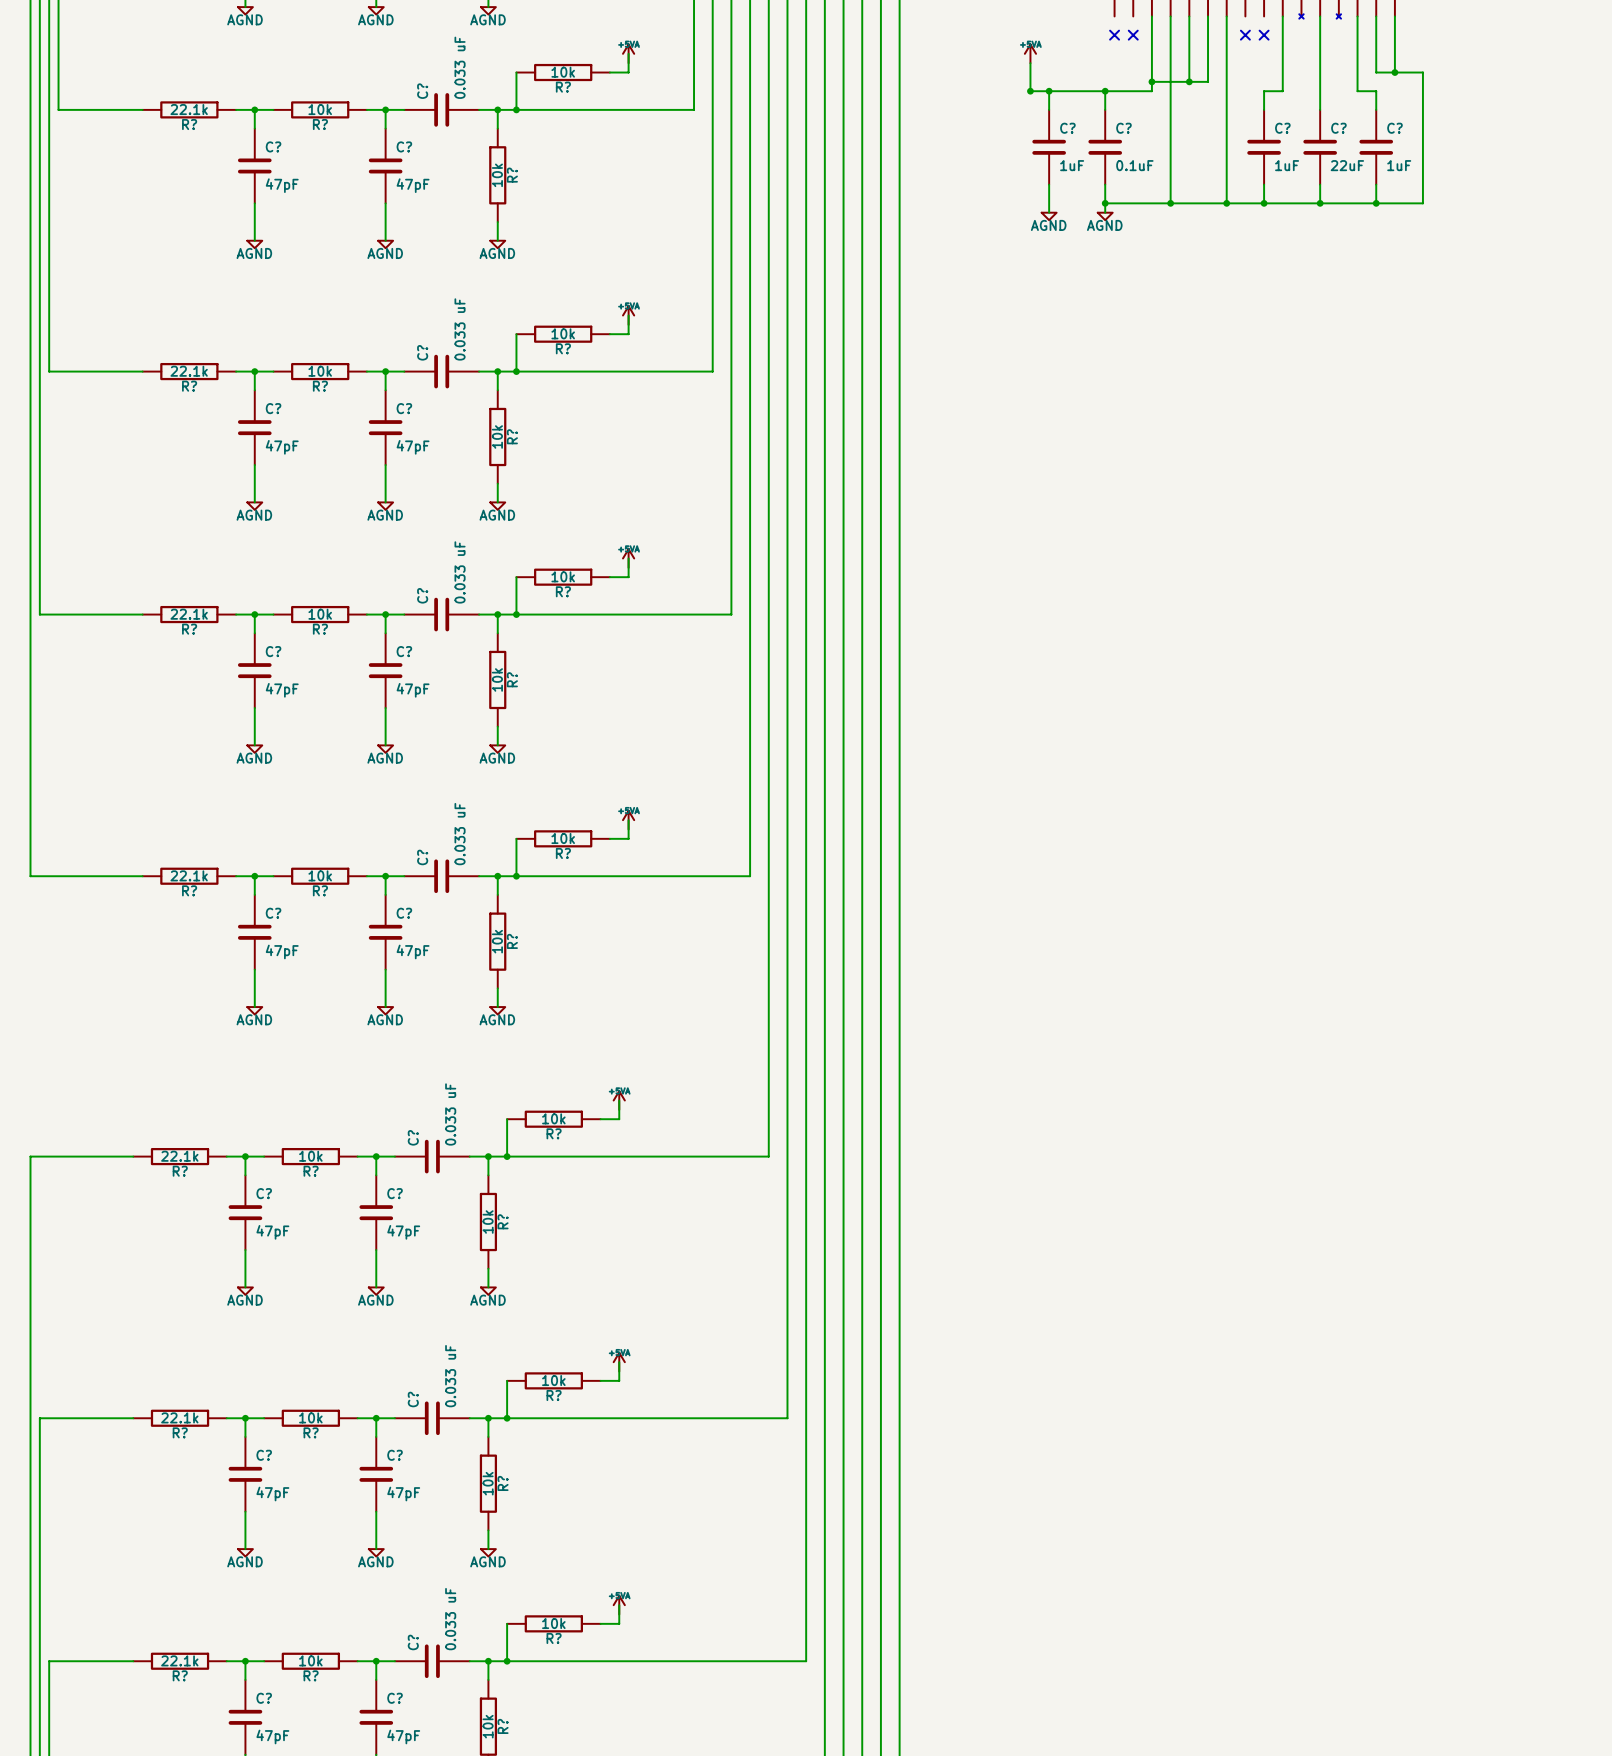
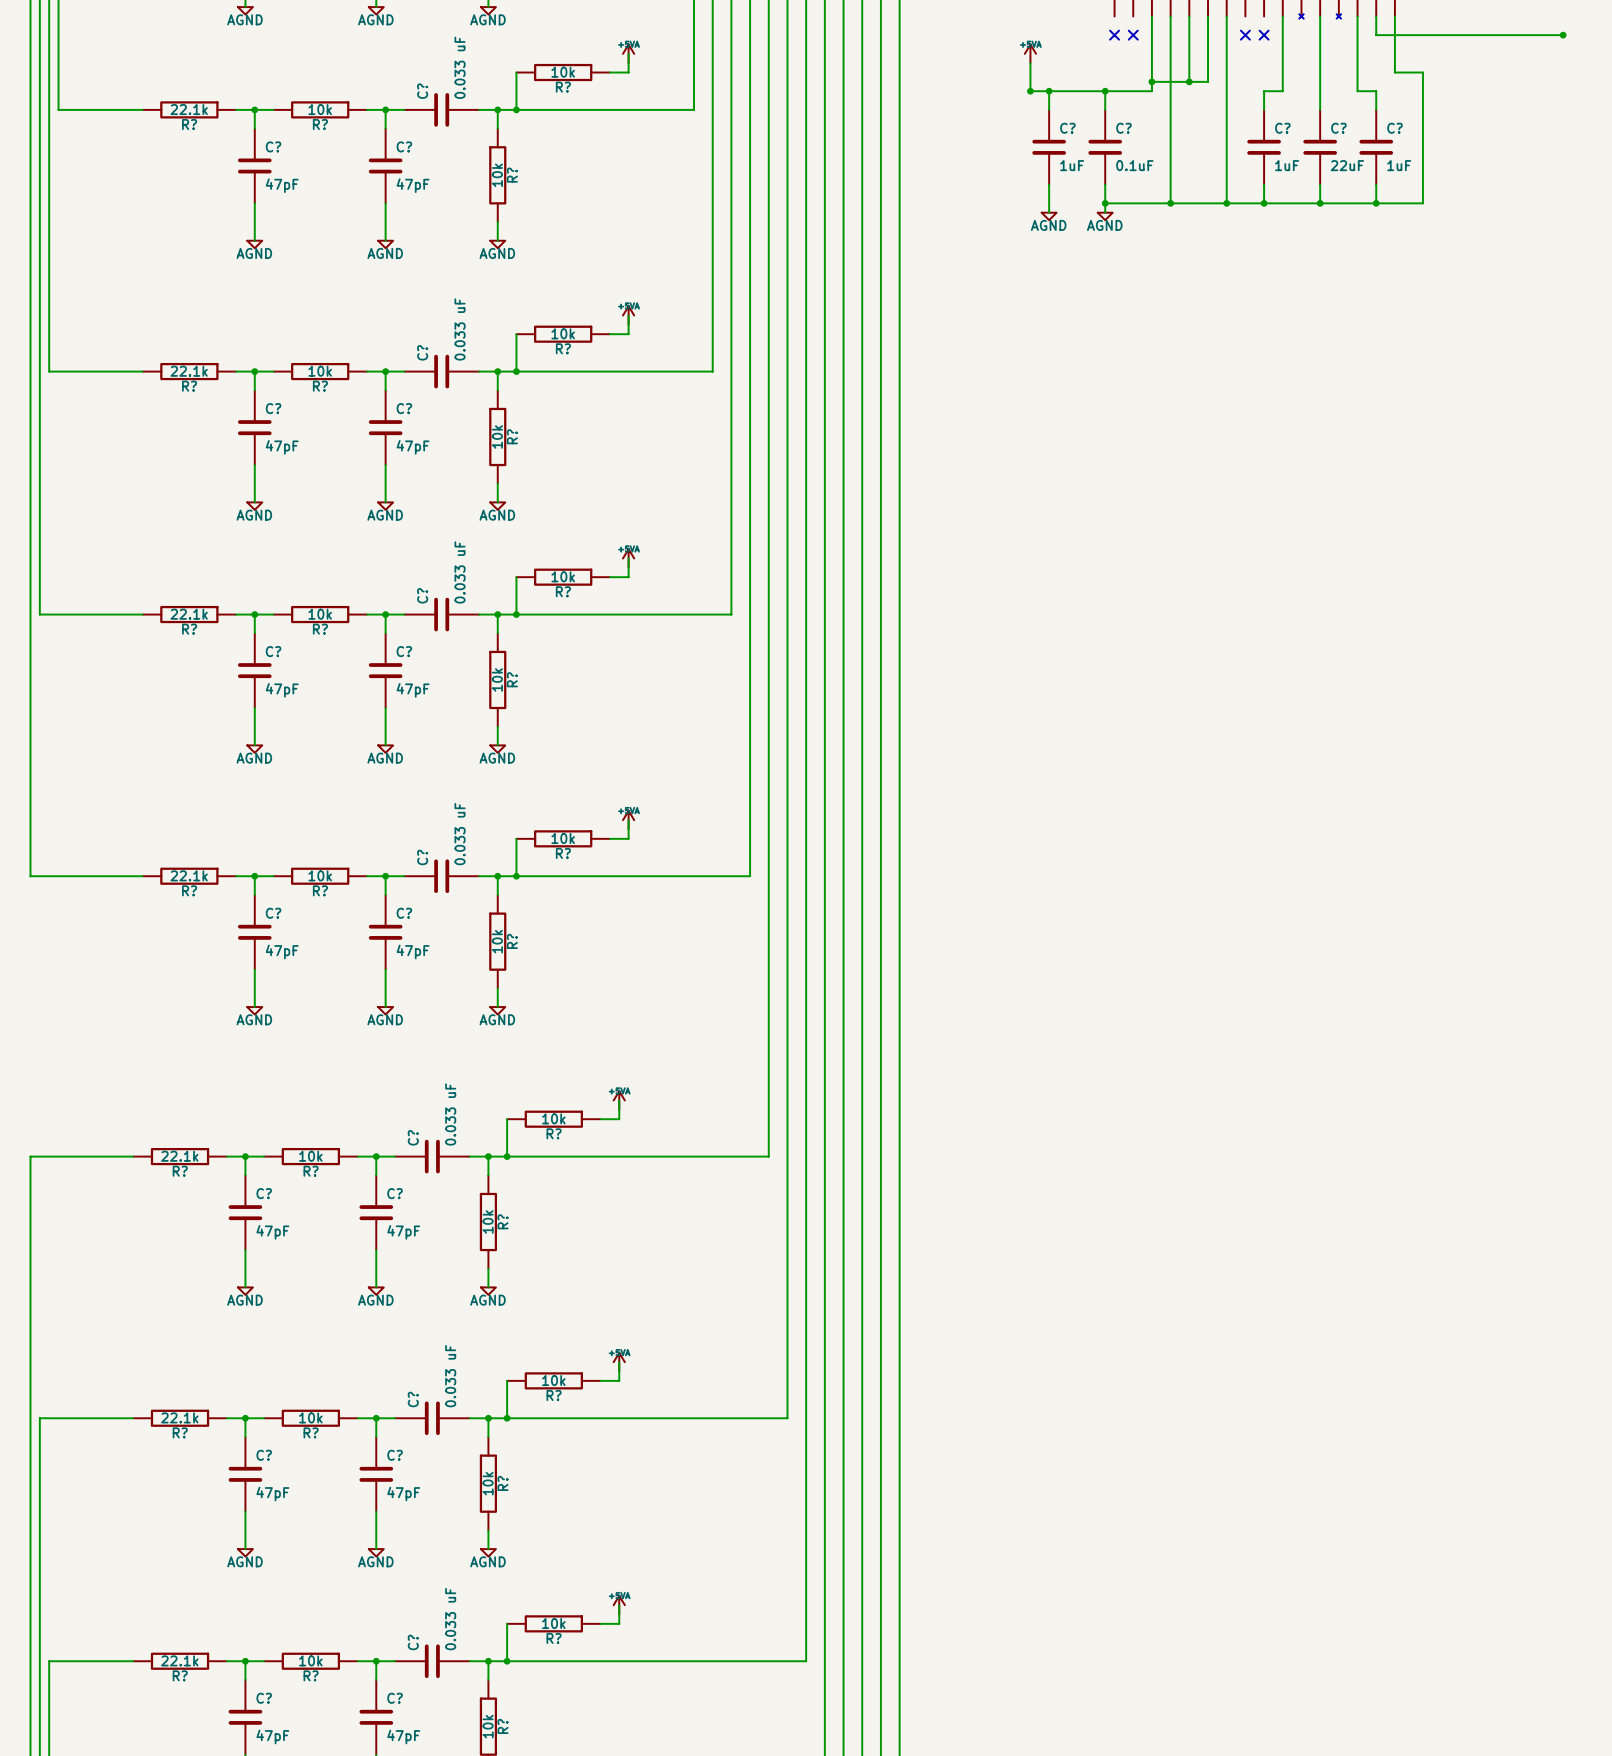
wire: (1376, 35) (1376, 72) (1394, 72) -> (1376, 35) (1563, 35)
junction: none -> (1563, 35)
junction: (1394, 72) -> none

